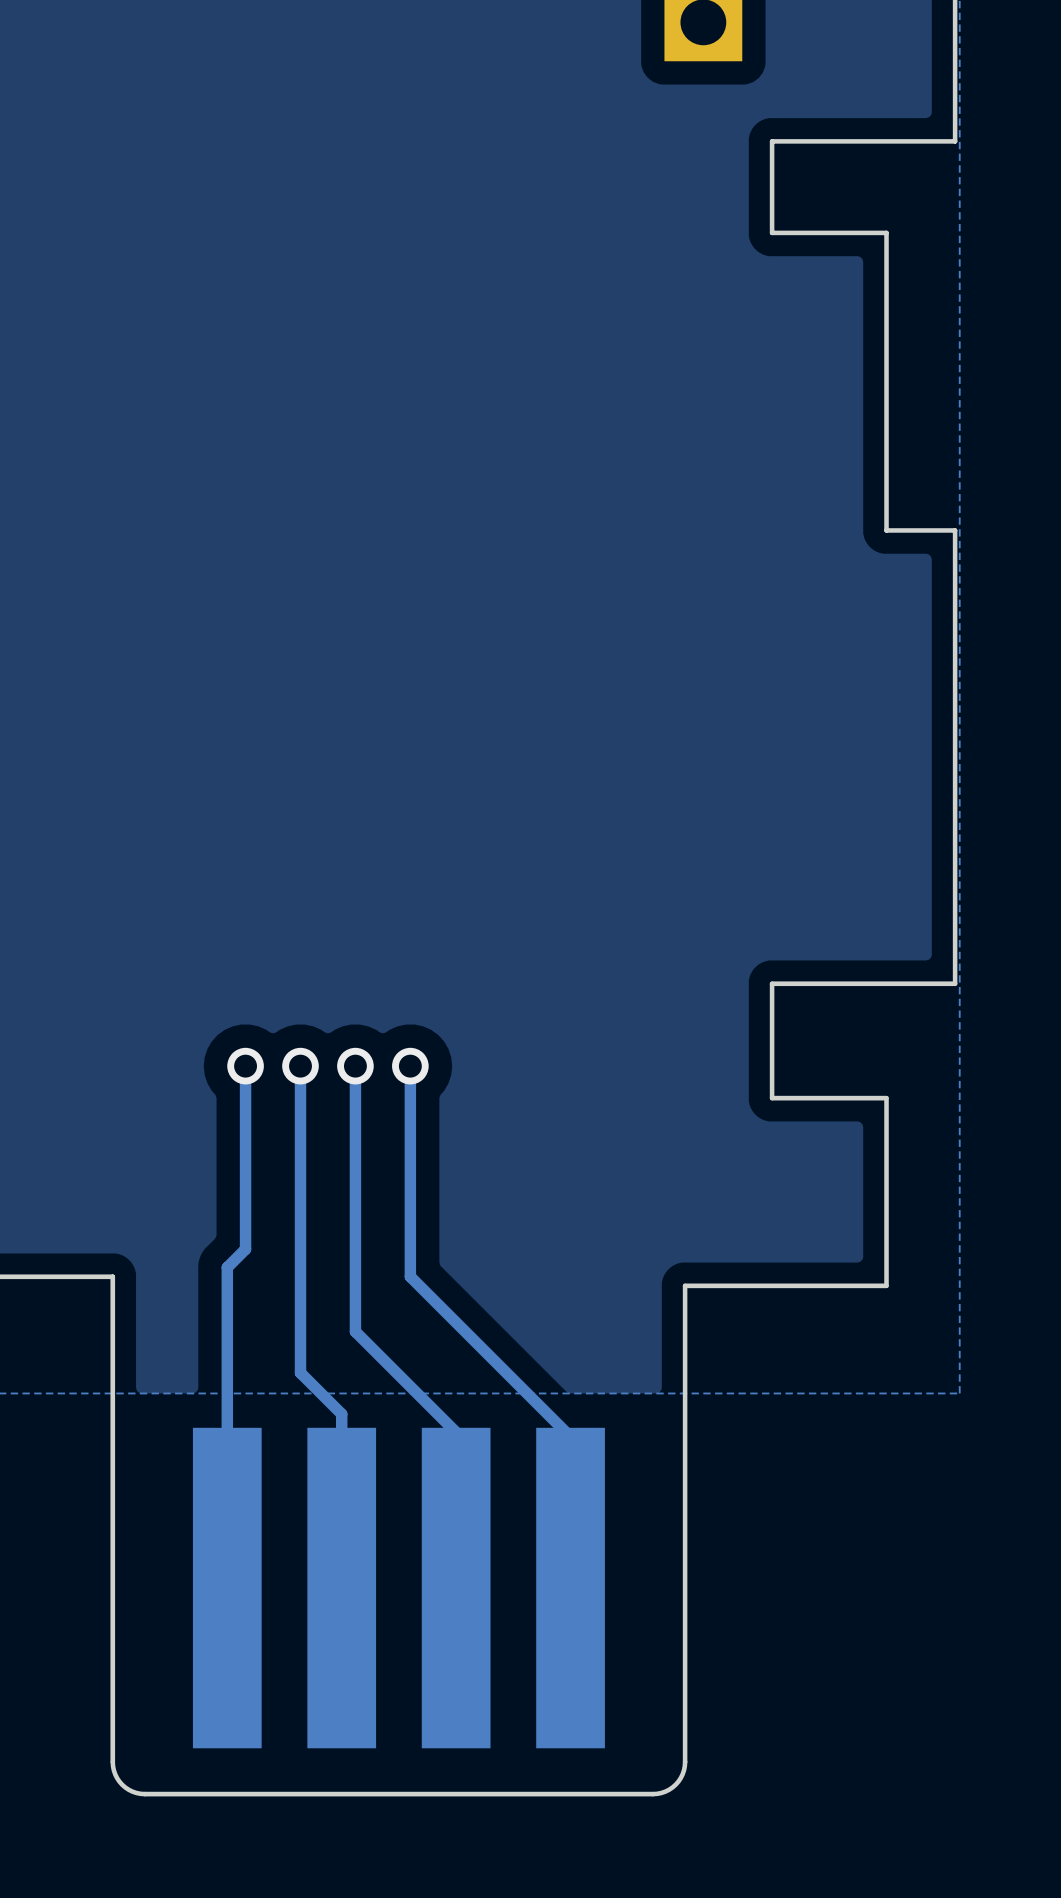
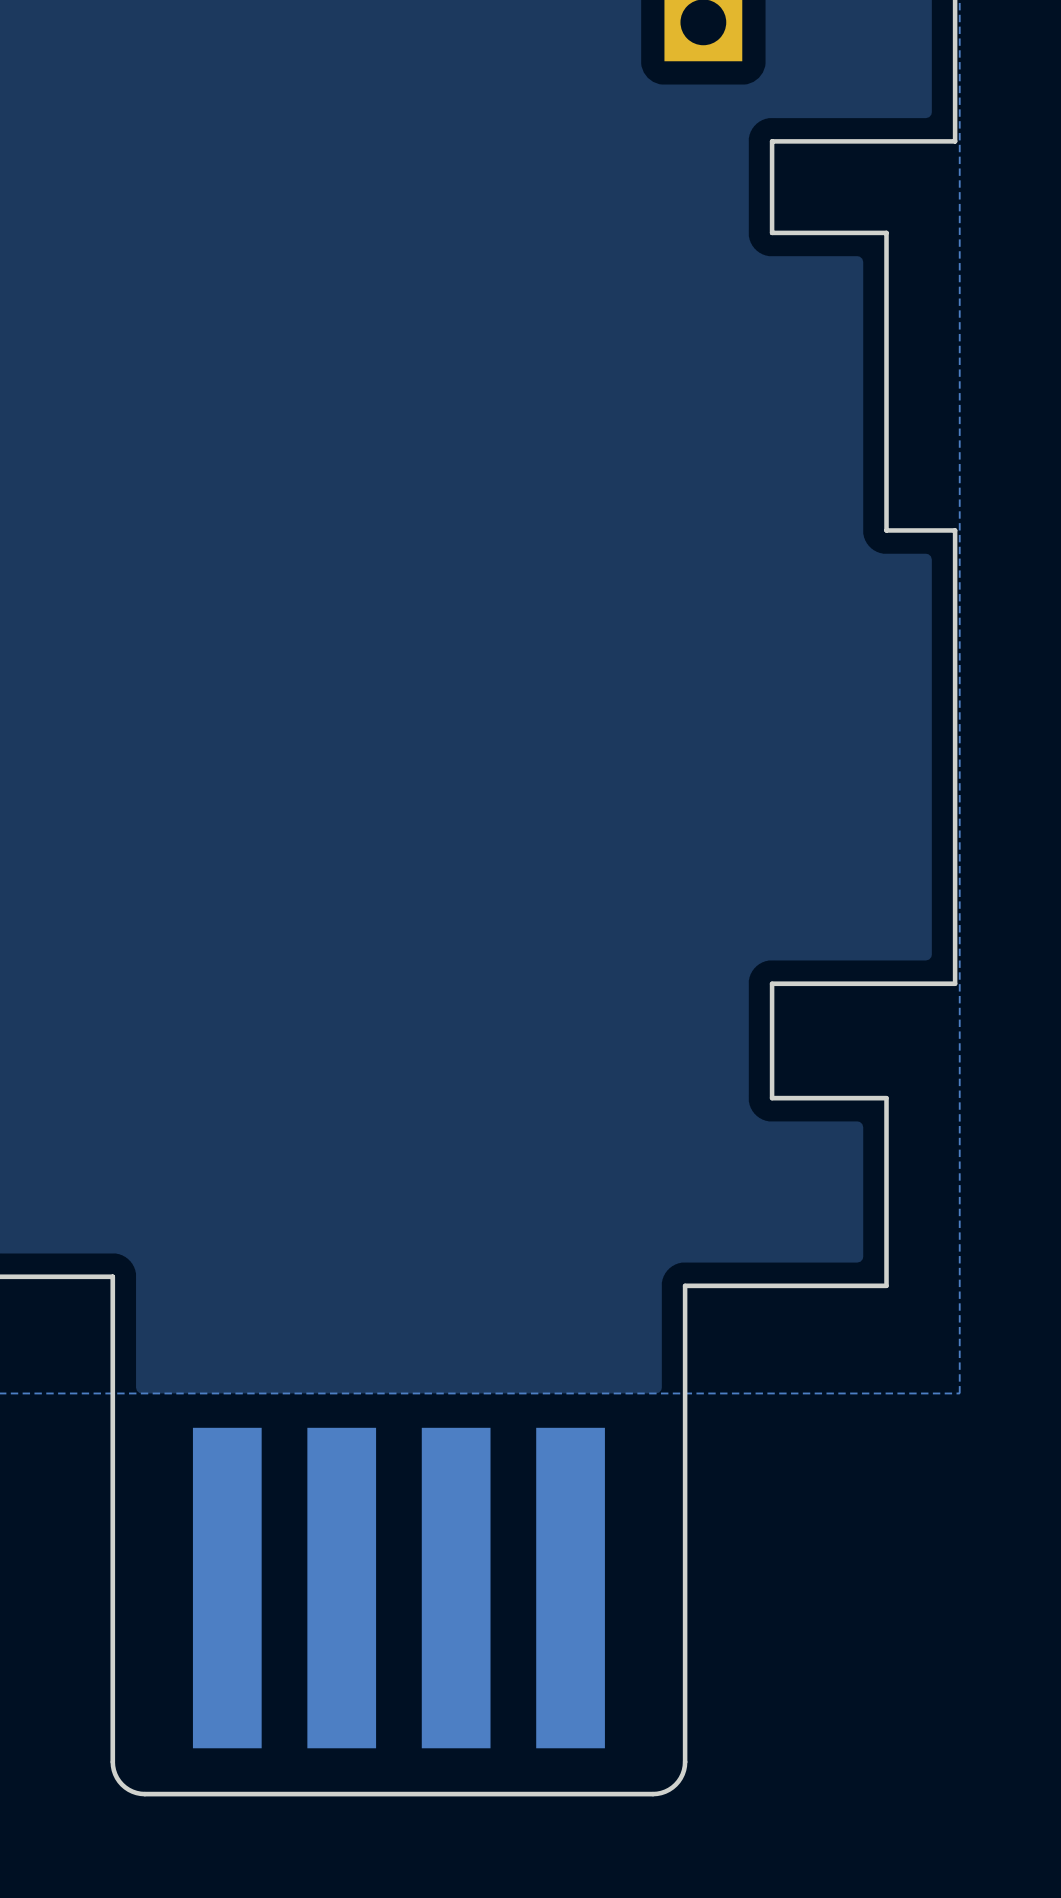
track: (245, 1066) (245, 1249) (227, 1267) (227, 1588) -> none
via: (245, 1066) -> none
track: (300, 1066) (300, 1372) (341, 1414) (341, 1588) -> none
via: (300, 1066) -> none
track: (355, 1066) (355, 1331) (456, 1432) (456, 1588) -> none
via: (355, 1066) -> none
track: (410, 1066) (410, 1276) (570, 1436) (570, 1588) -> none
via: (410, 1066) -> none

